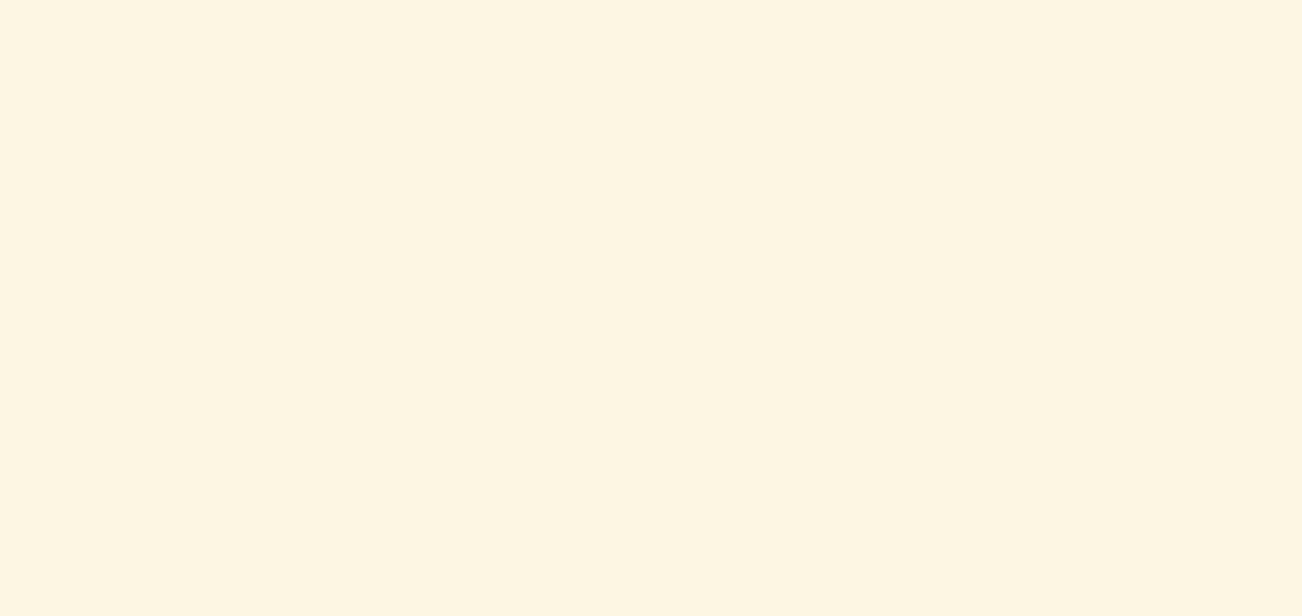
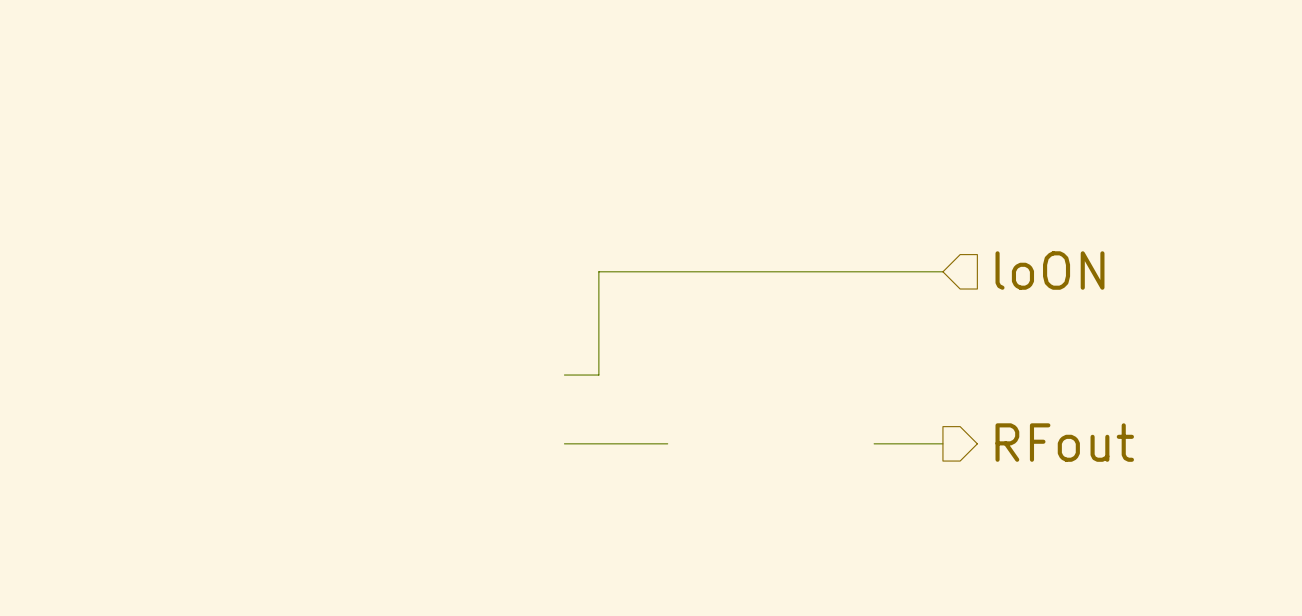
hierarchical label: none -> loON (1049, 270)
wire: none -> (942, 271) (598, 271) (598, 375) (564, 375)
hierarchical label: none -> RFout (1064, 442)
wire: none -> (564, 443) (667, 443)
wire: none -> (874, 443) (942, 443)

